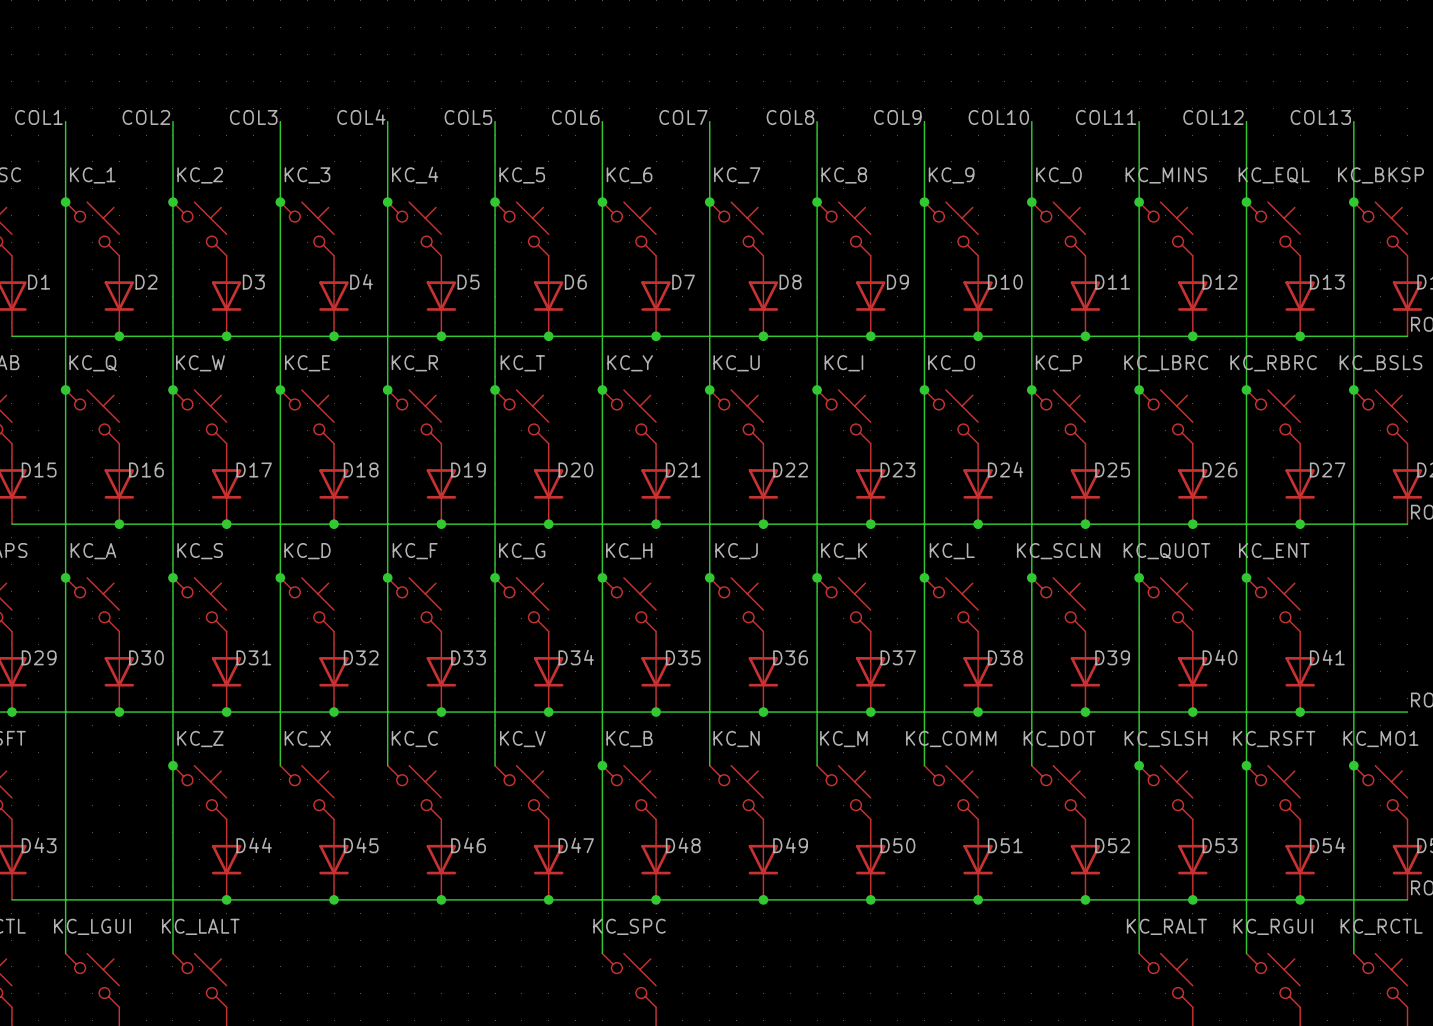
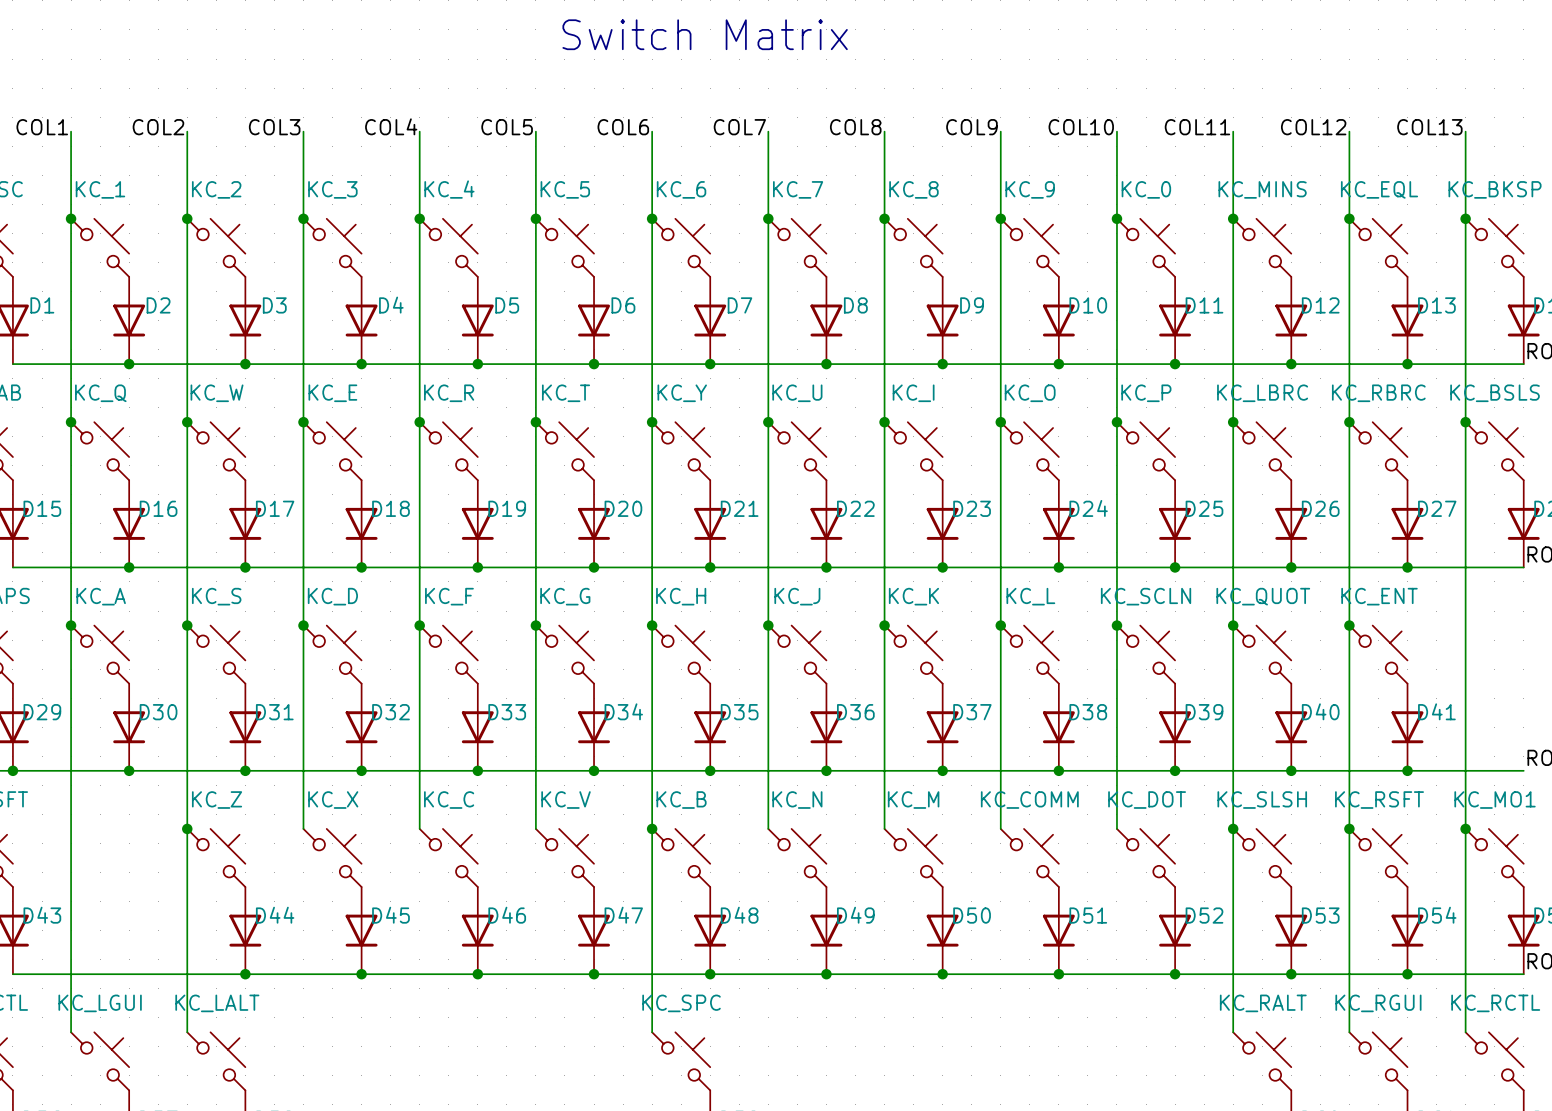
text: none -> Switch Matrix (705, 34)

